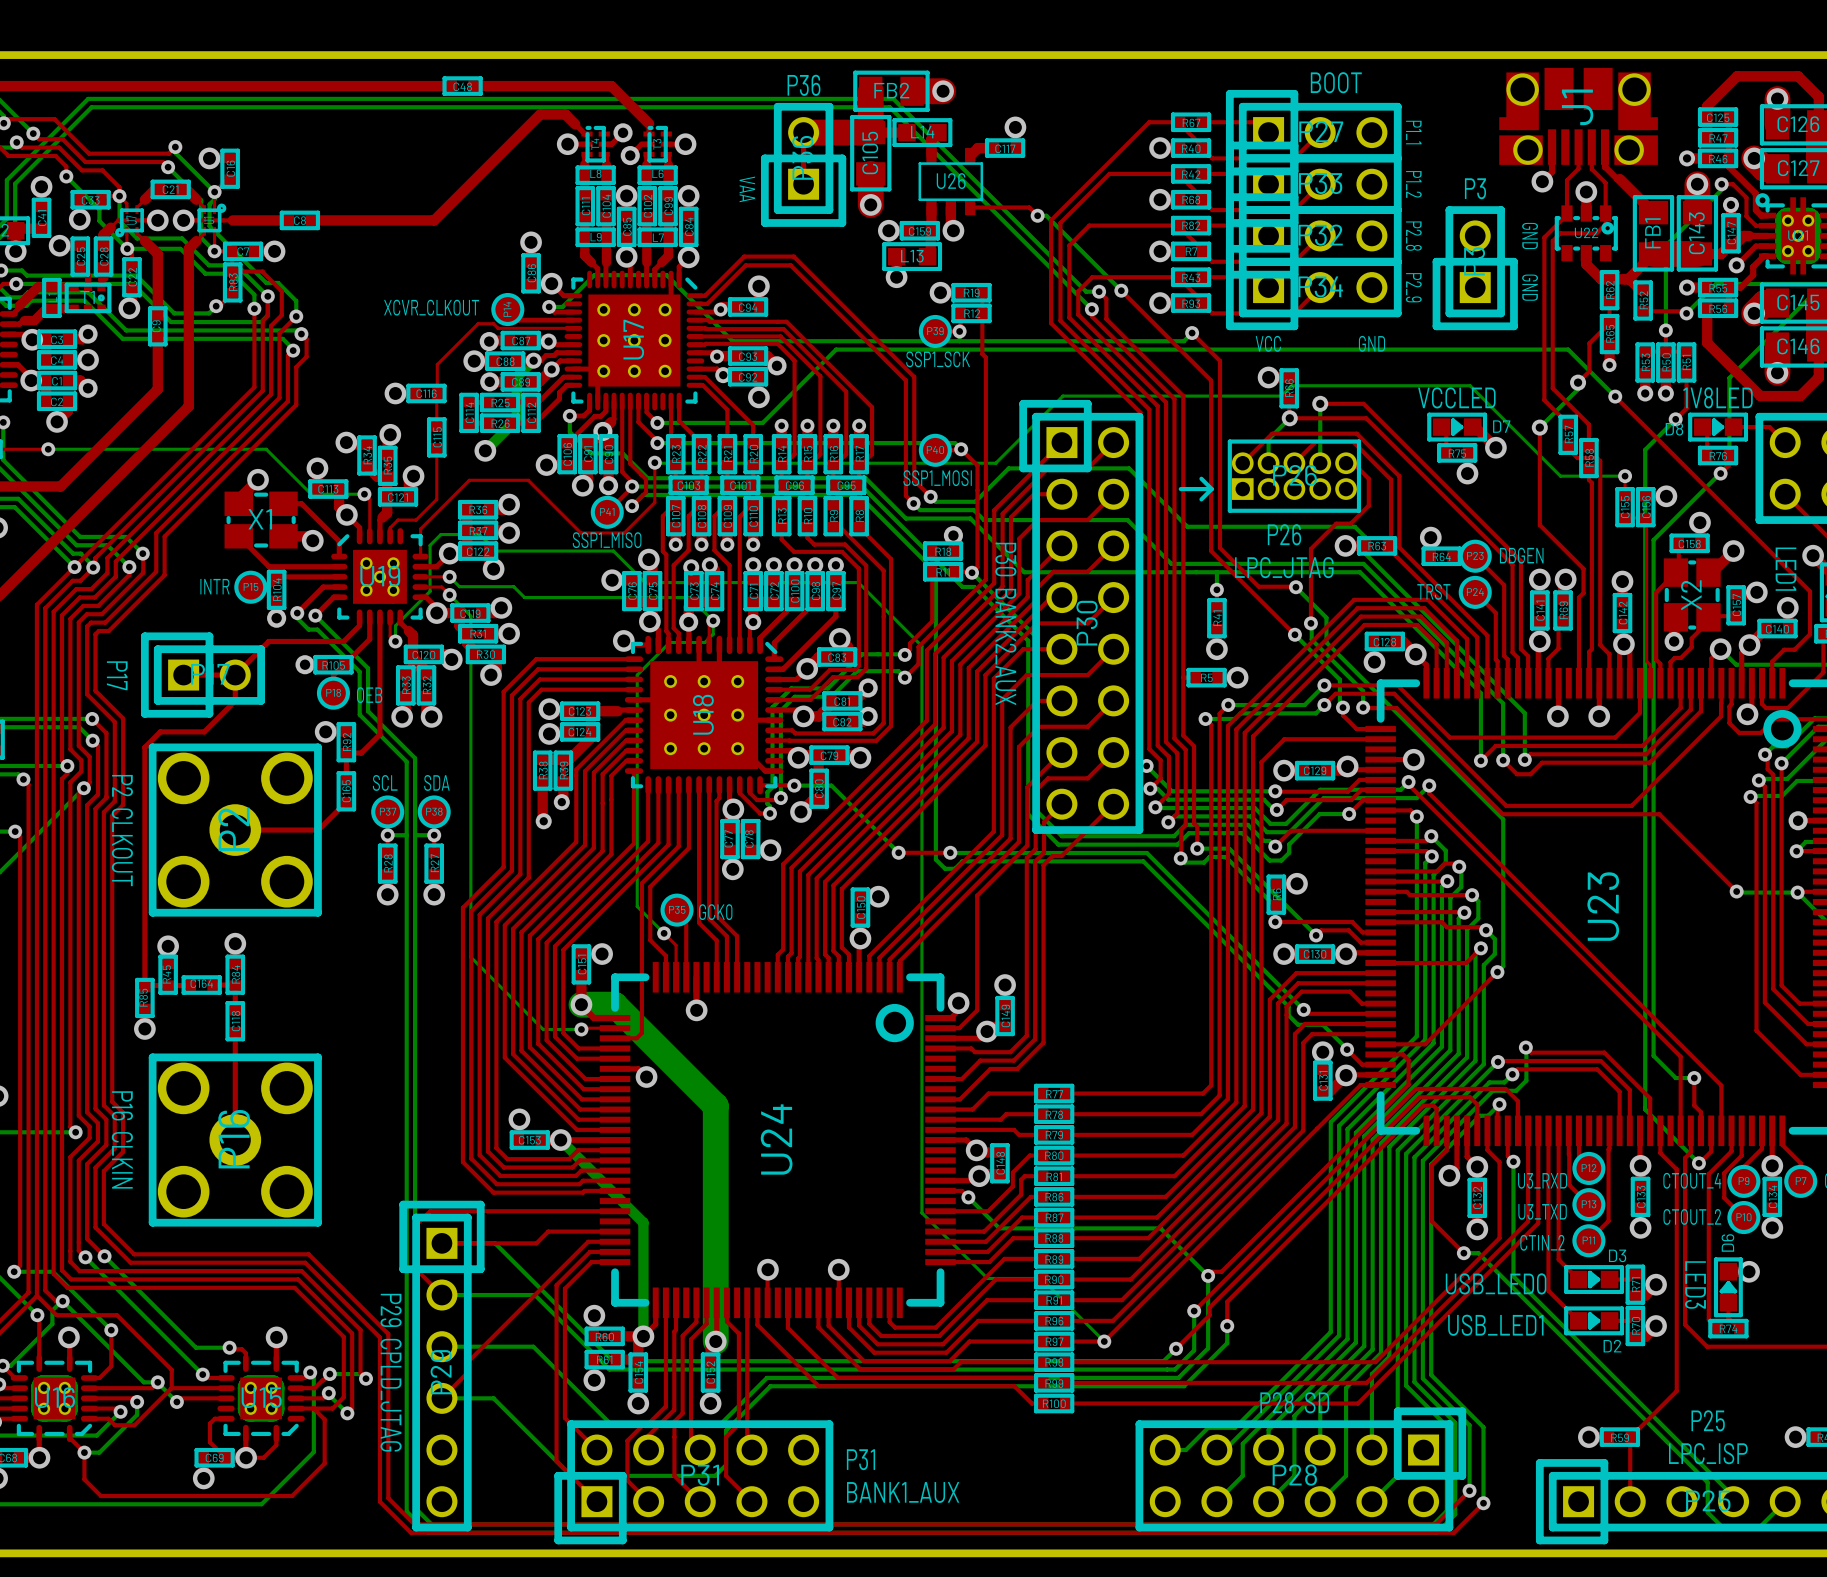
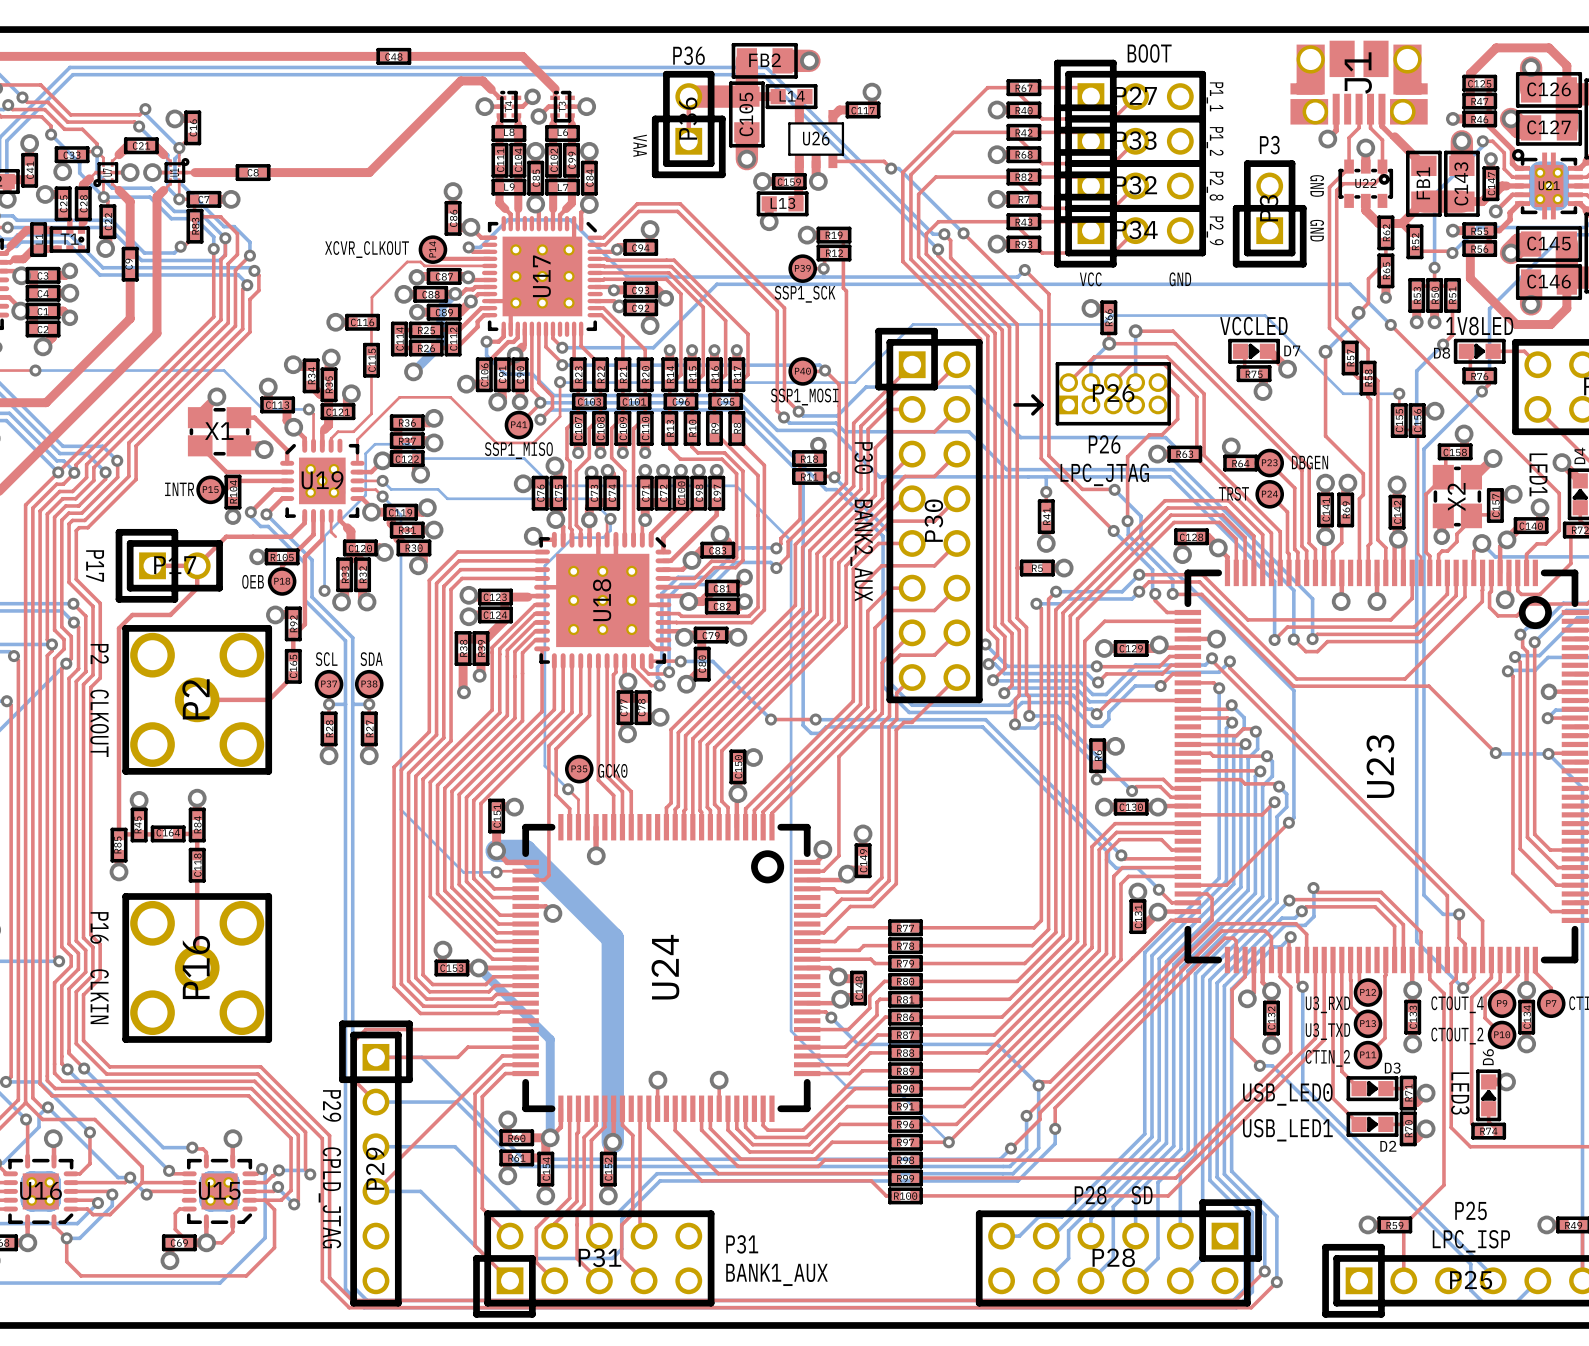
bottom track: (430, 591) (395, 625) (395, 641) -> (365, 493) (324, 536) (324, 590)
via position: (395, 641) -> (324, 590)
top track: (379, 644) (379, 734) (361, 753) (349, 753) -> (322, 539) (304, 556) (304, 624) (295, 633)
text position: OEB (369, 695) -> OEB (253, 581)

